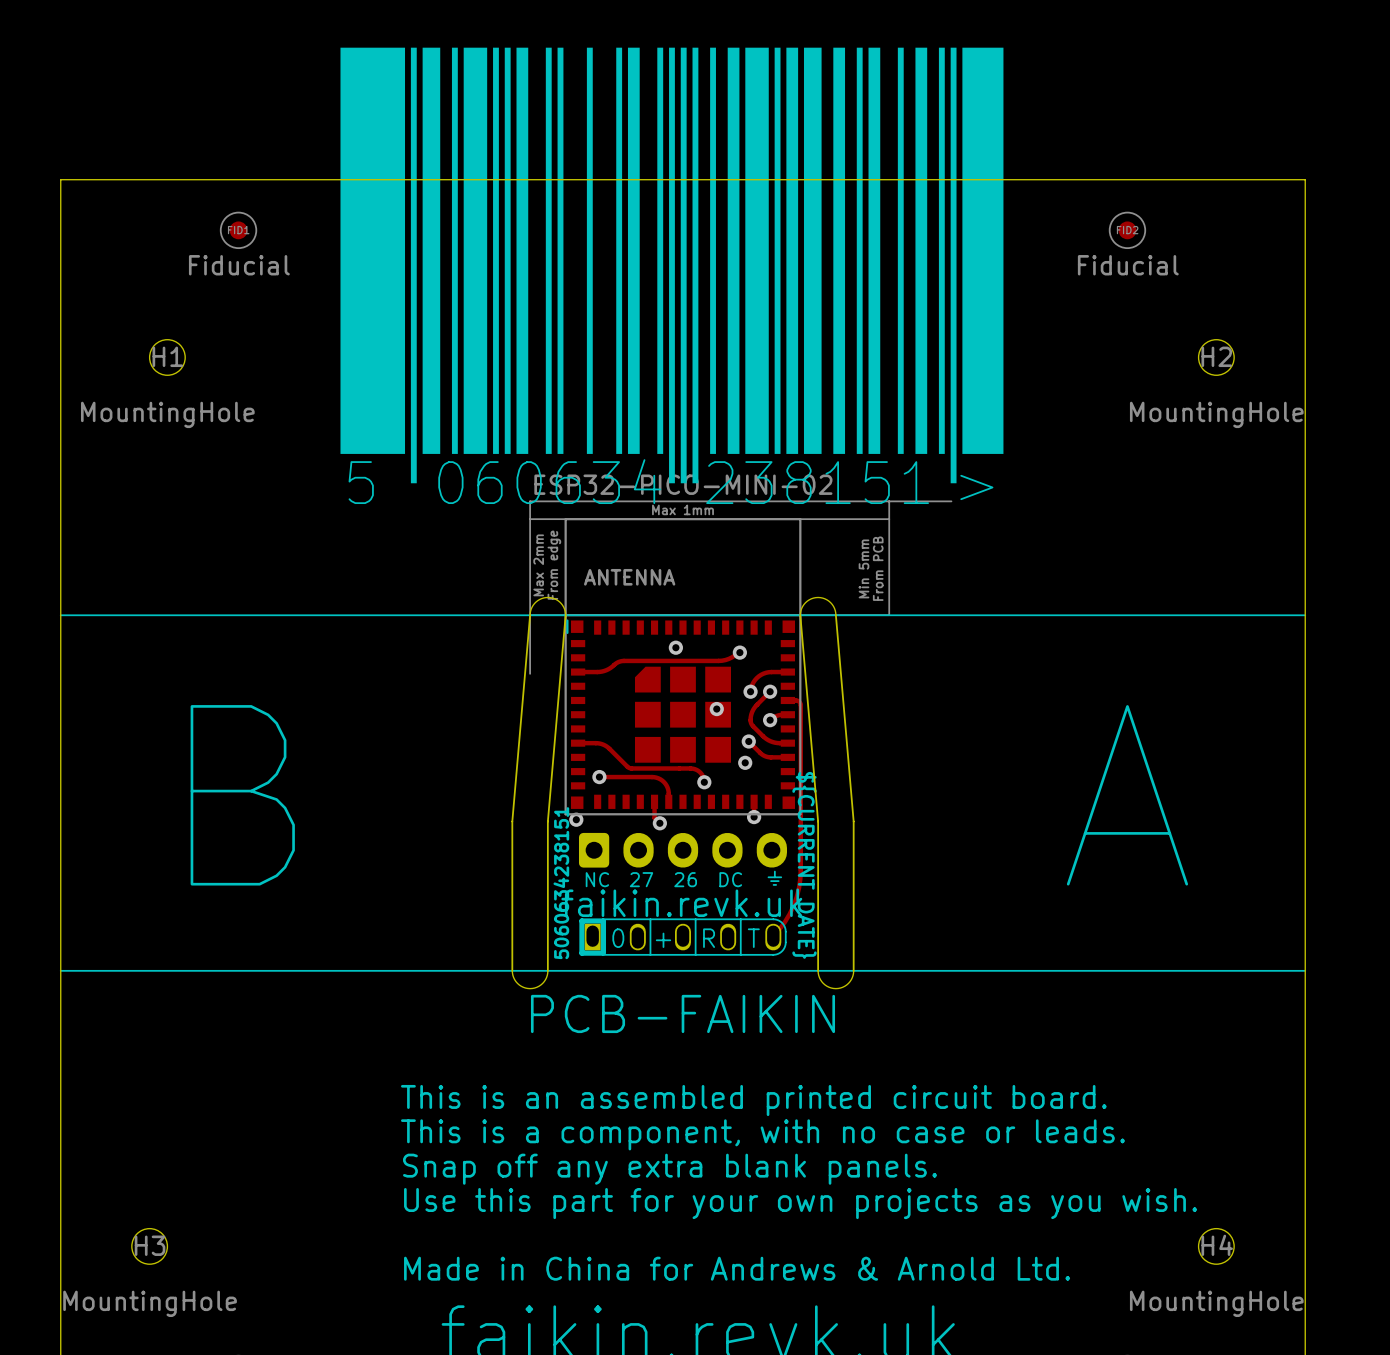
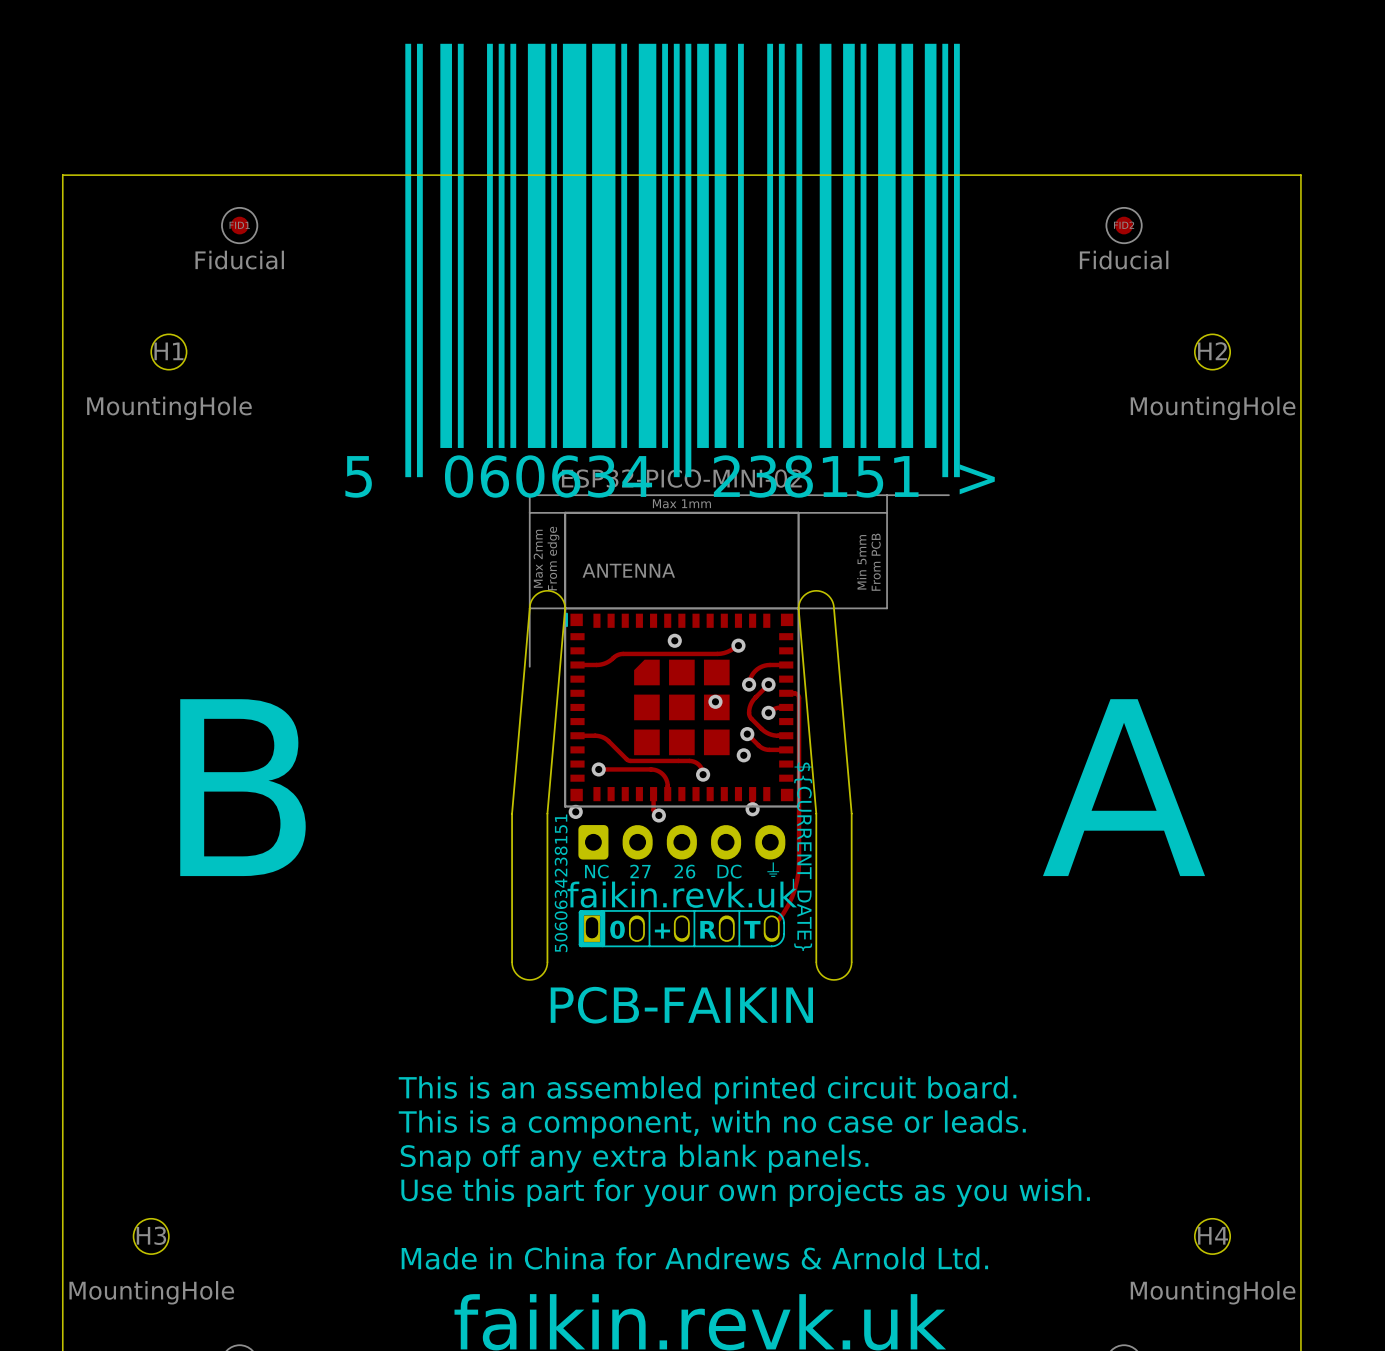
drawing shape: [340, 47, 1004, 505] -> [345, 43, 995, 498]
line: (60, 615) (1305, 615) -> none
line: (60, 970) (1305, 970) -> none

